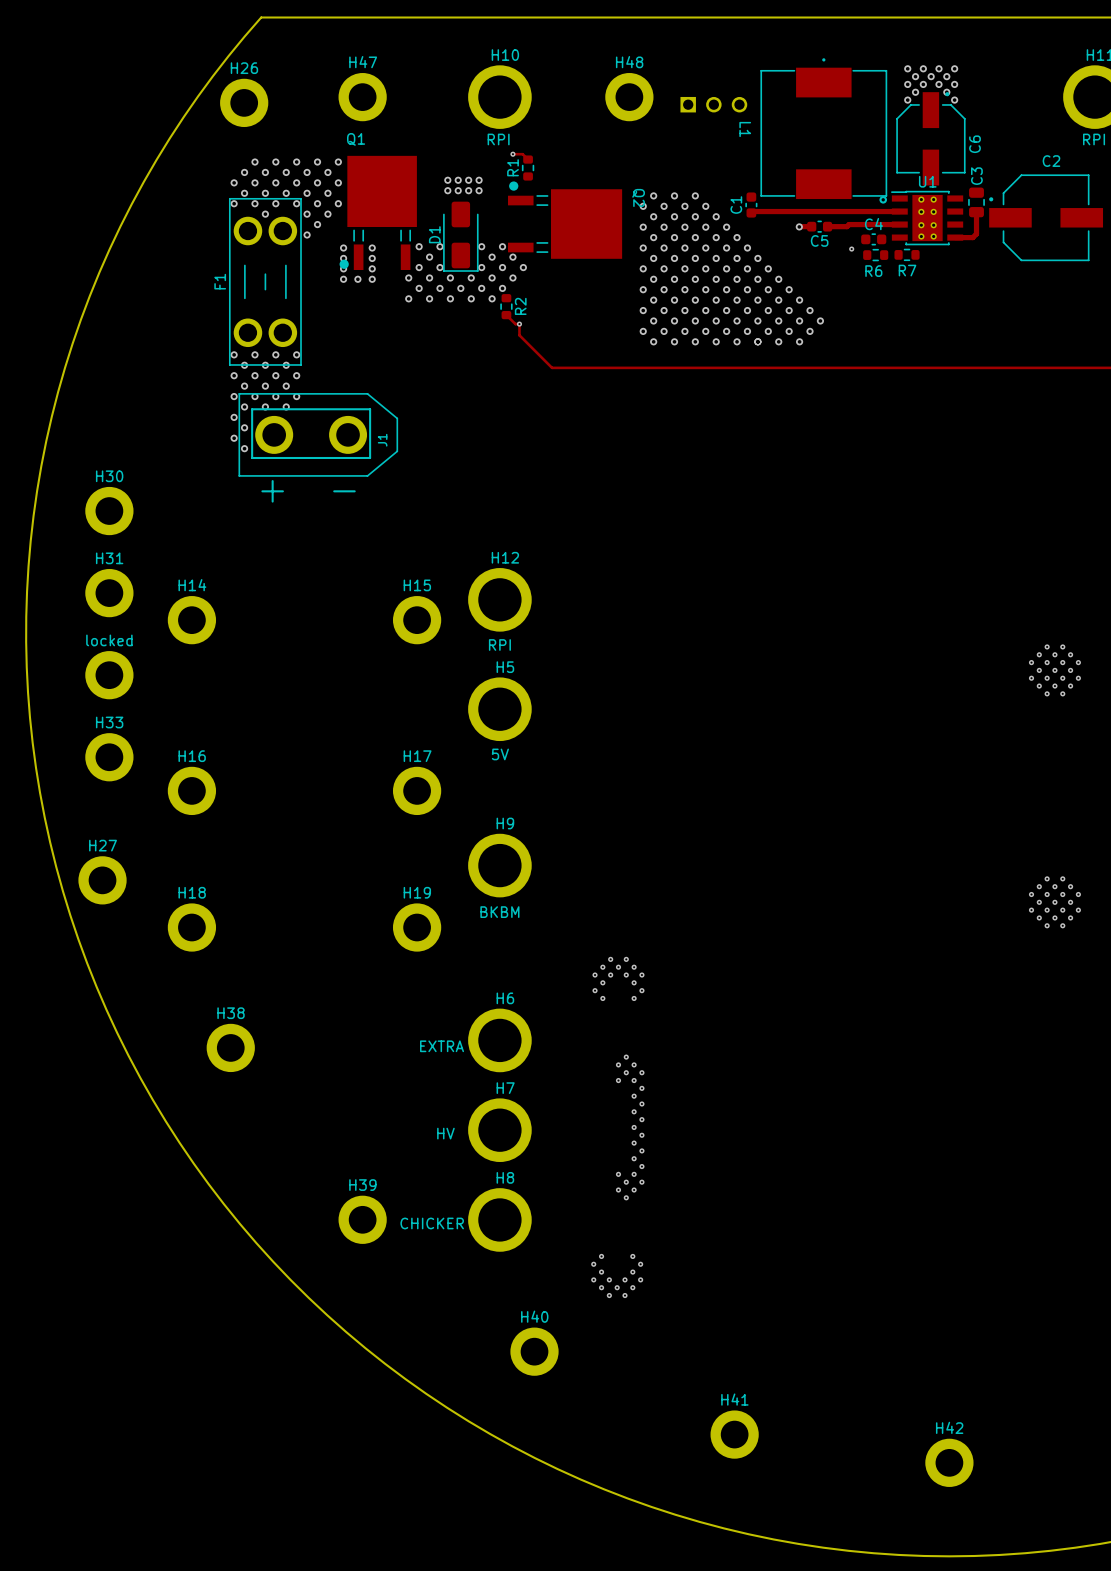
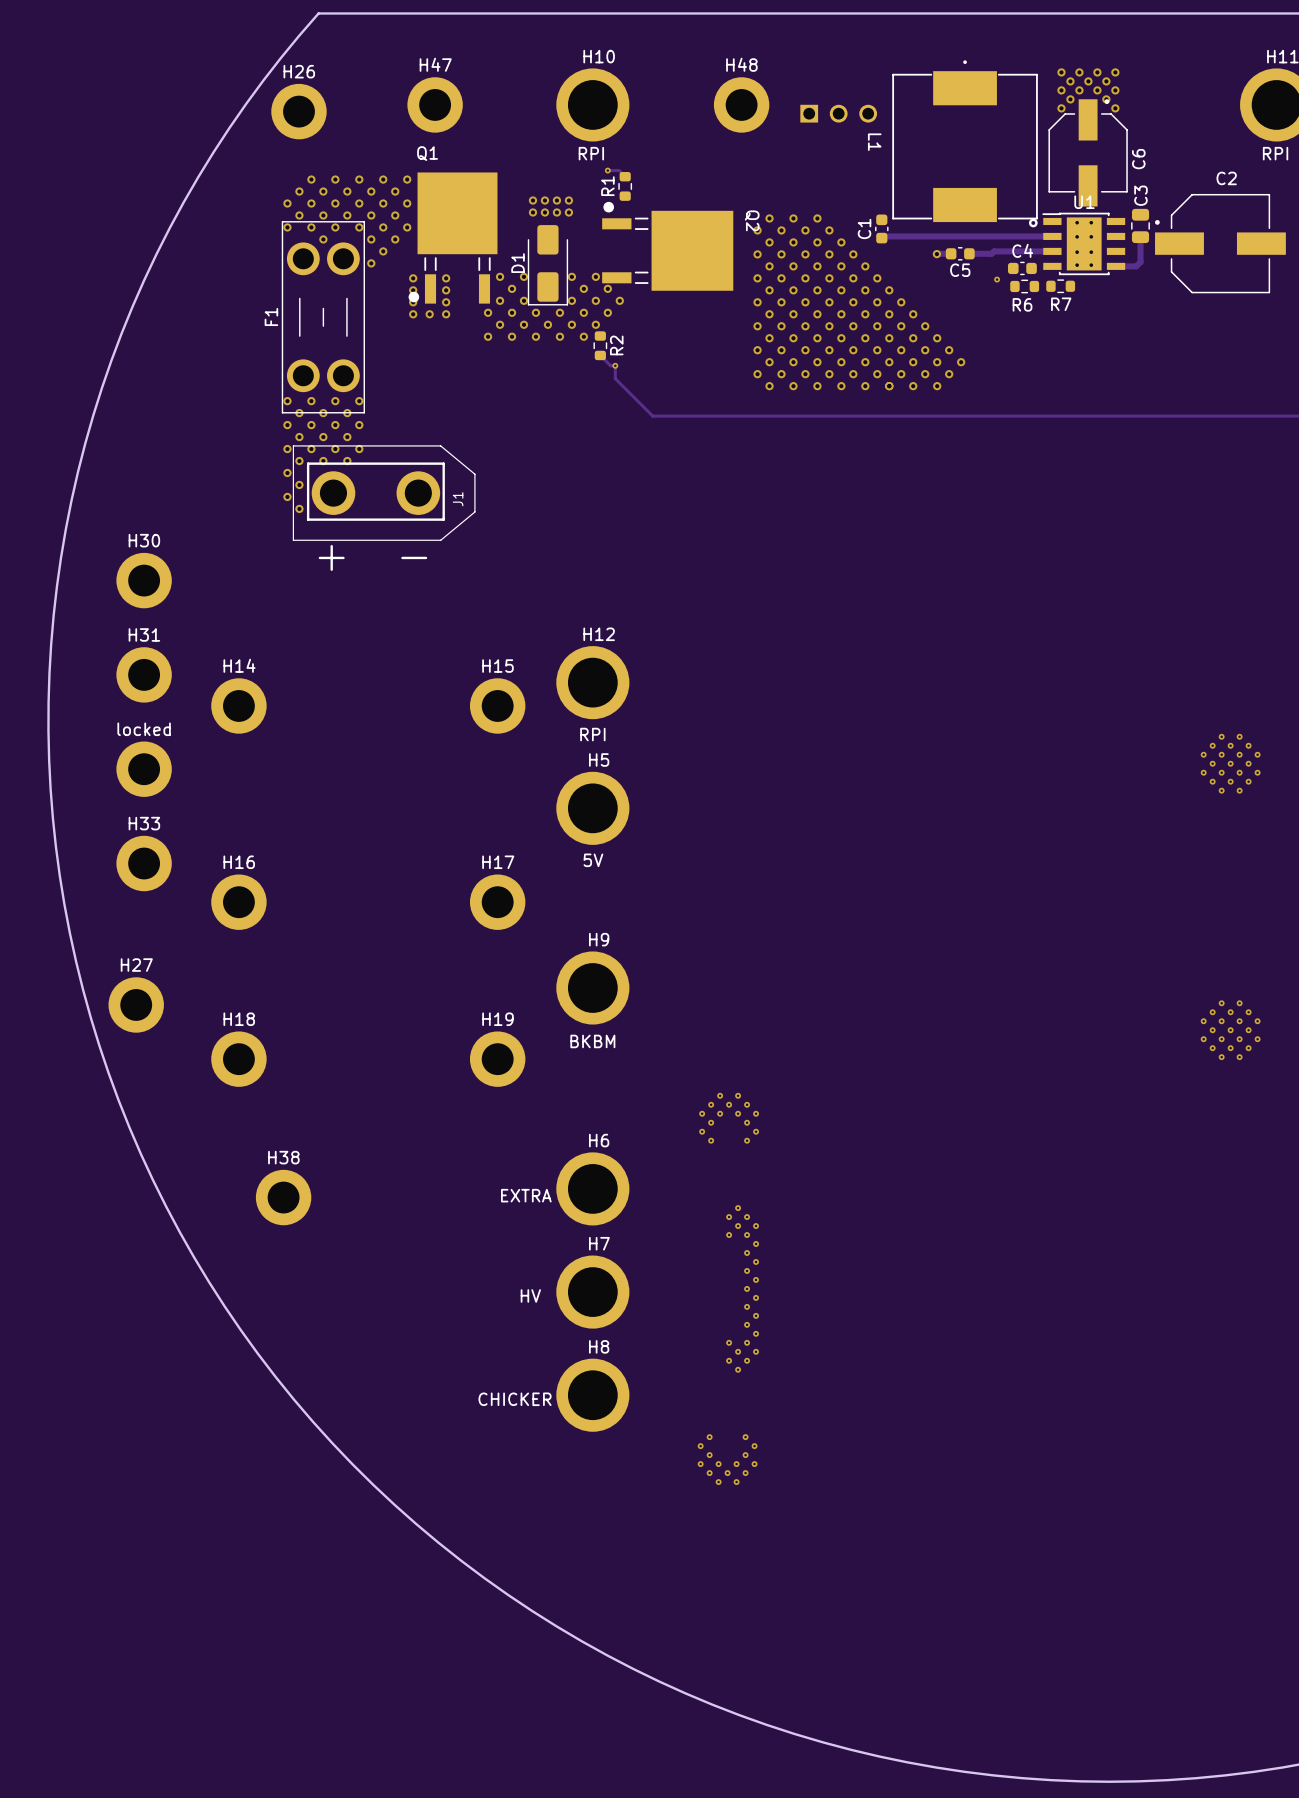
H39: (362, 1219) -> none
H40: (534, 1351) -> none
H41: (734, 1434) -> none
H42: (949, 1462) -> none

